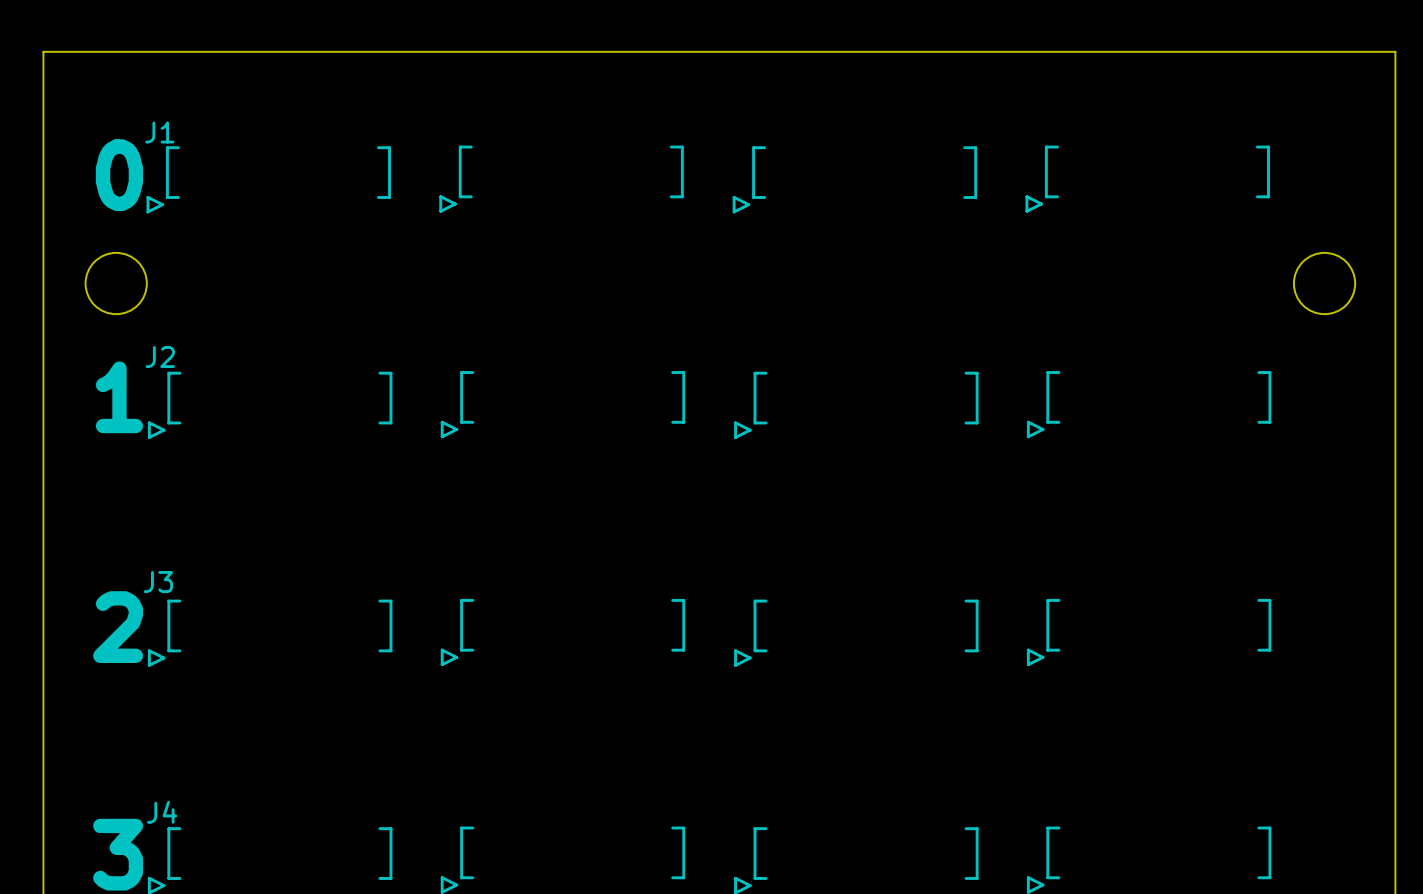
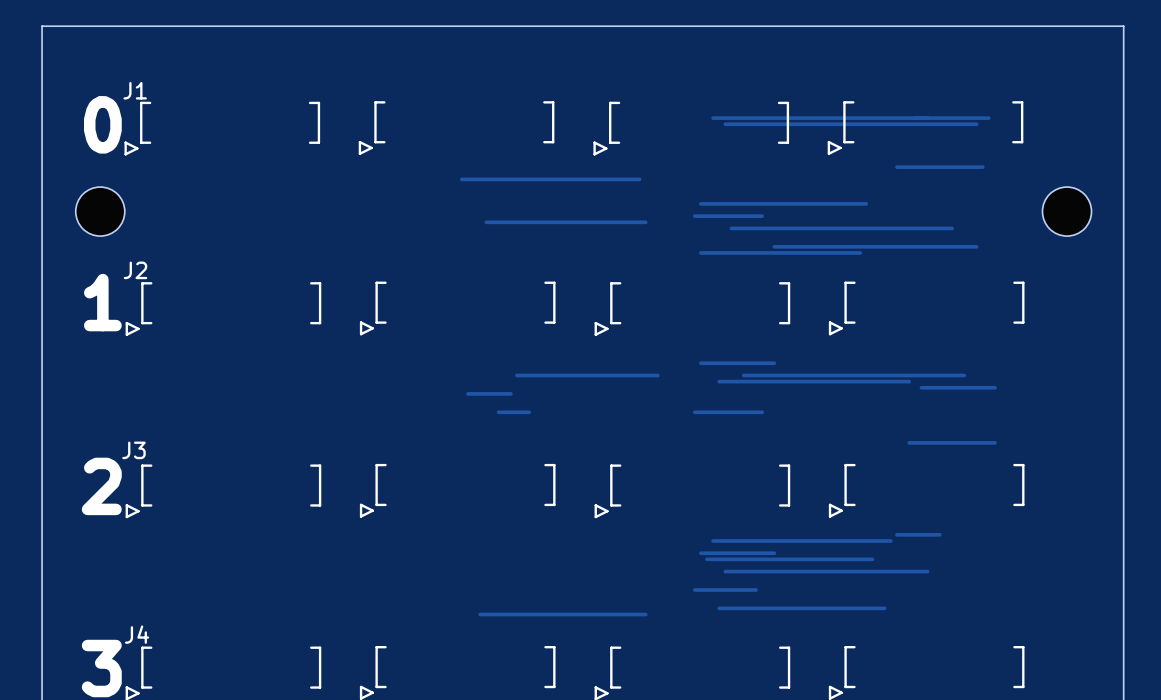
track: none -> (713, 118) (988, 118)
track: none -> (725, 124) (976, 124)
track: none -> (896, 167) (982, 167)
track: none -> (461, 179) (639, 179)
track: none -> (700, 203) (866, 203)
track: none -> (694, 216) (762, 216)
track: none -> (486, 222) (645, 222)
track: none -> (731, 228) (952, 228)
track: none -> (774, 246) (976, 246)
track: none -> (700, 252) (860, 252)
track: none -> (700, 363) (774, 363)
track: none -> (516, 375) (657, 375)
track: none -> (743, 375) (964, 375)
track: none -> (719, 381) (909, 381)
track: none -> (921, 387) (994, 387)
track: none -> (467, 393) (510, 393)
track: none -> (498, 412) (529, 412)
track: none -> (694, 412) (762, 412)
track: none -> (909, 442) (994, 442)
track: none -> (896, 534) (939, 534)
track: none -> (713, 540) (890, 540)
track: none -> (700, 553) (774, 553)
track: none -> (706, 559) (872, 559)
track: none -> (725, 571) (927, 571)
track: none -> (694, 589) (755, 589)
track: none -> (719, 608) (884, 608)
track: none -> (480, 614) (645, 614)

